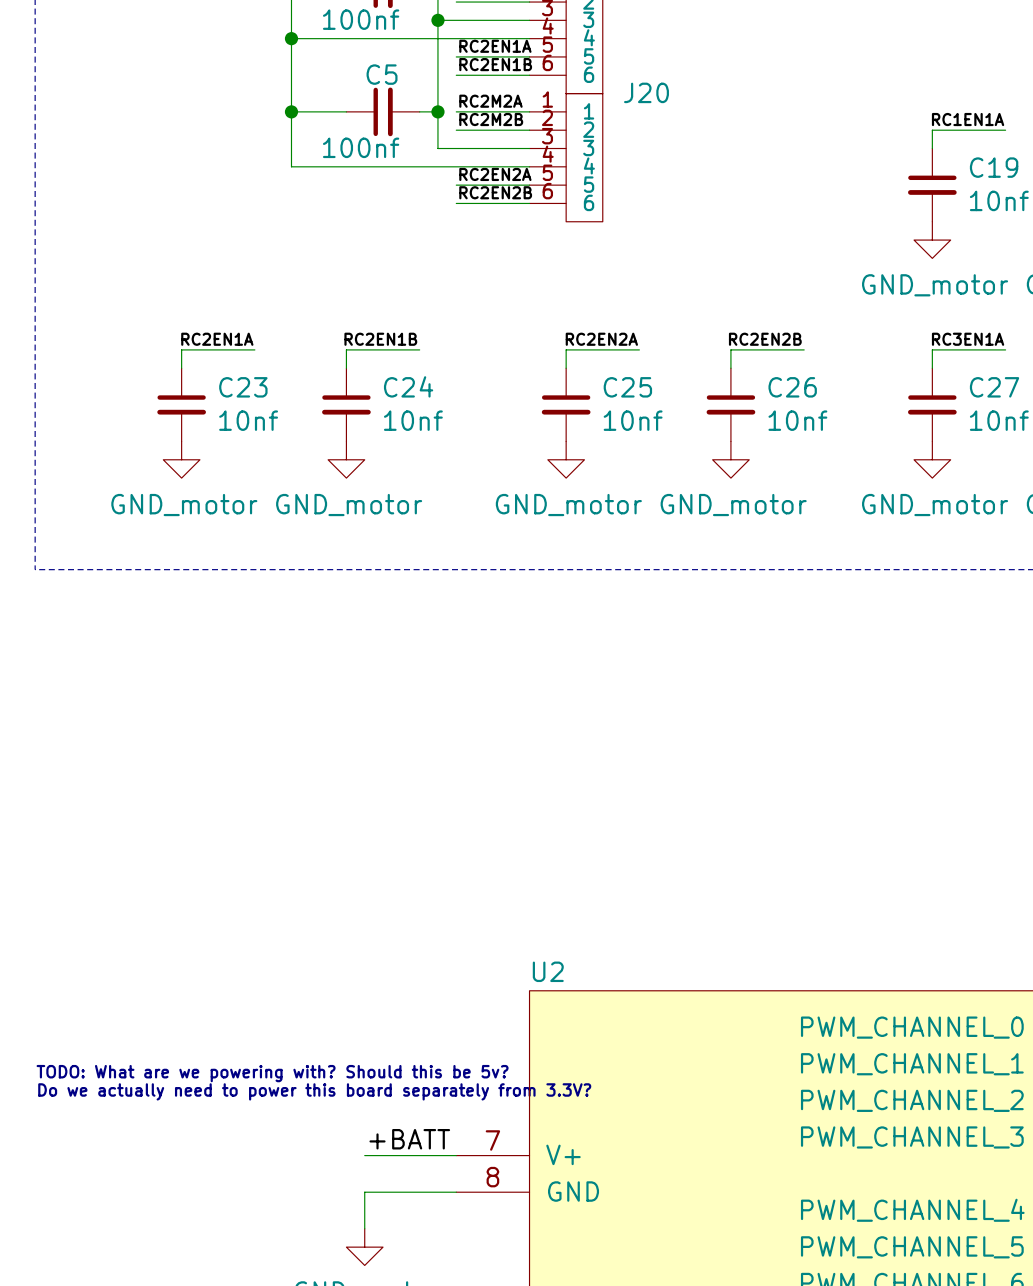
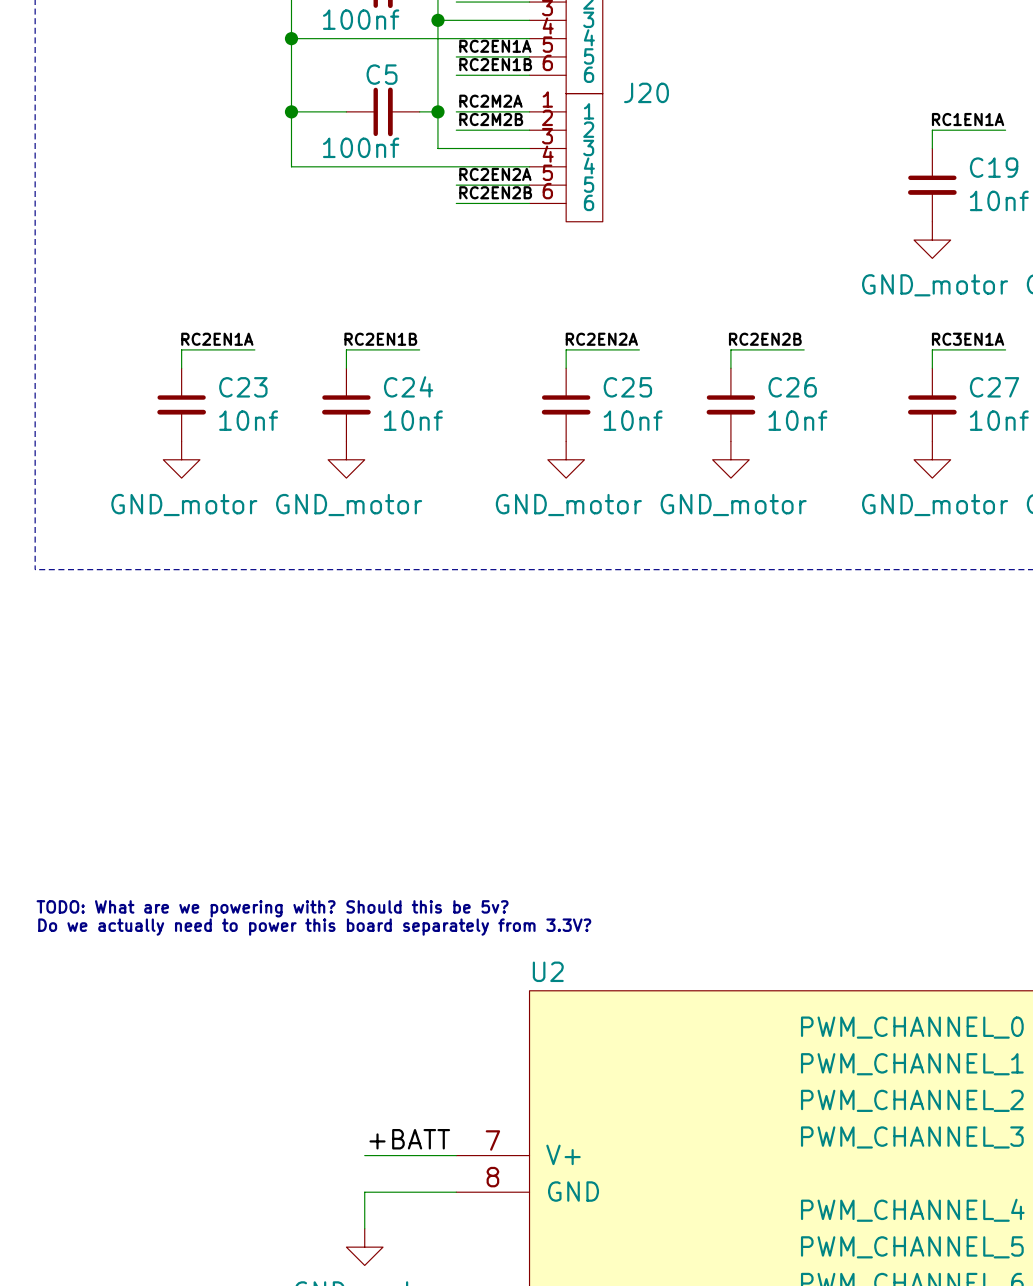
text position: TODO: What are we powering with? Should this be 5v? (272, 1073) -> TODO: What are we powering with? Should this be 5v? (272, 908)
text position: Do we actually need to power this board separately from 3.3V? (314, 1091) -> Do we actually need to power this board separately from 3.3V? (314, 927)

